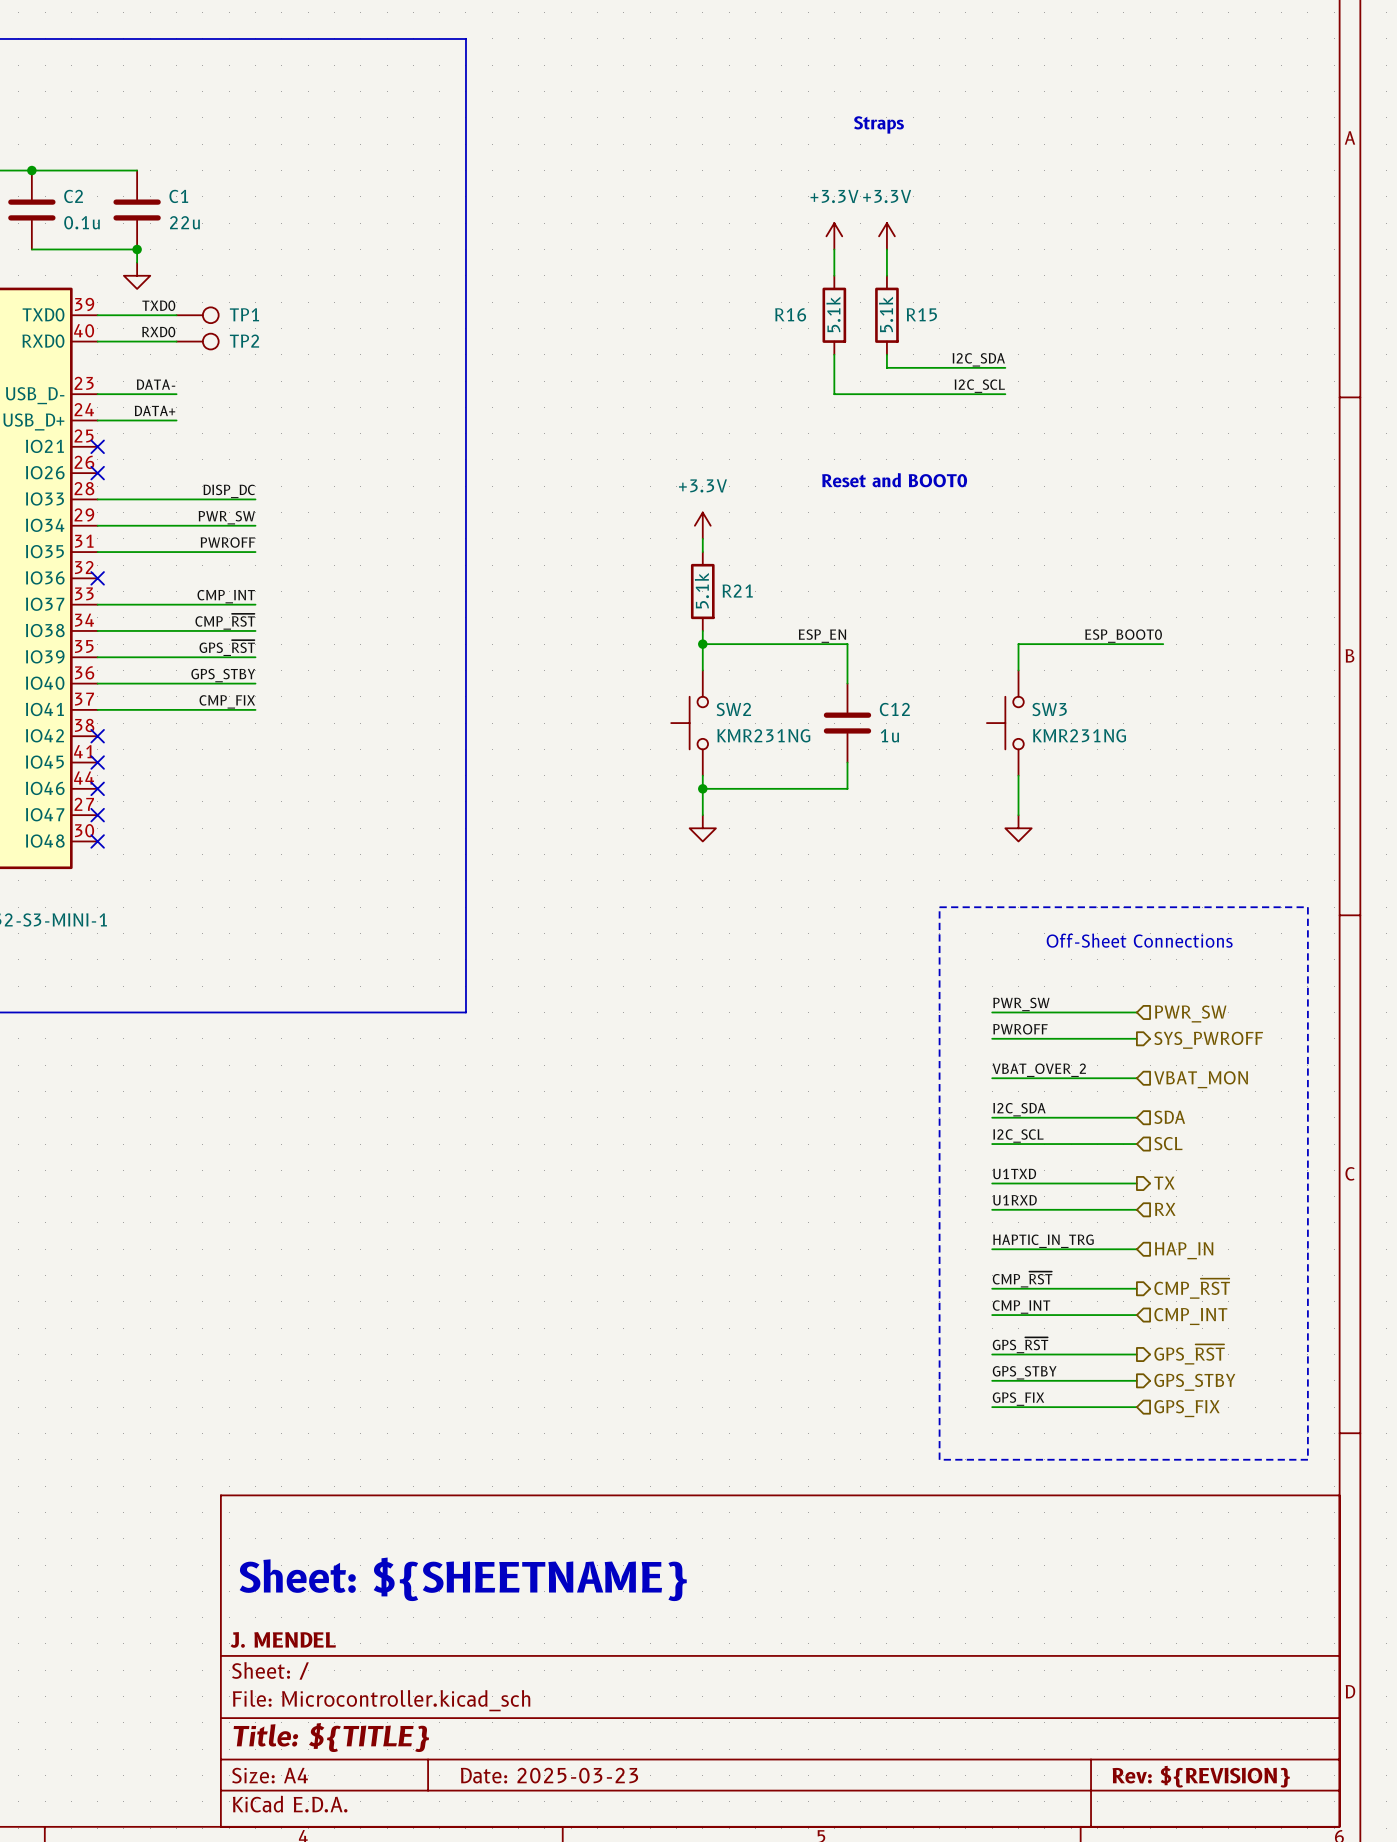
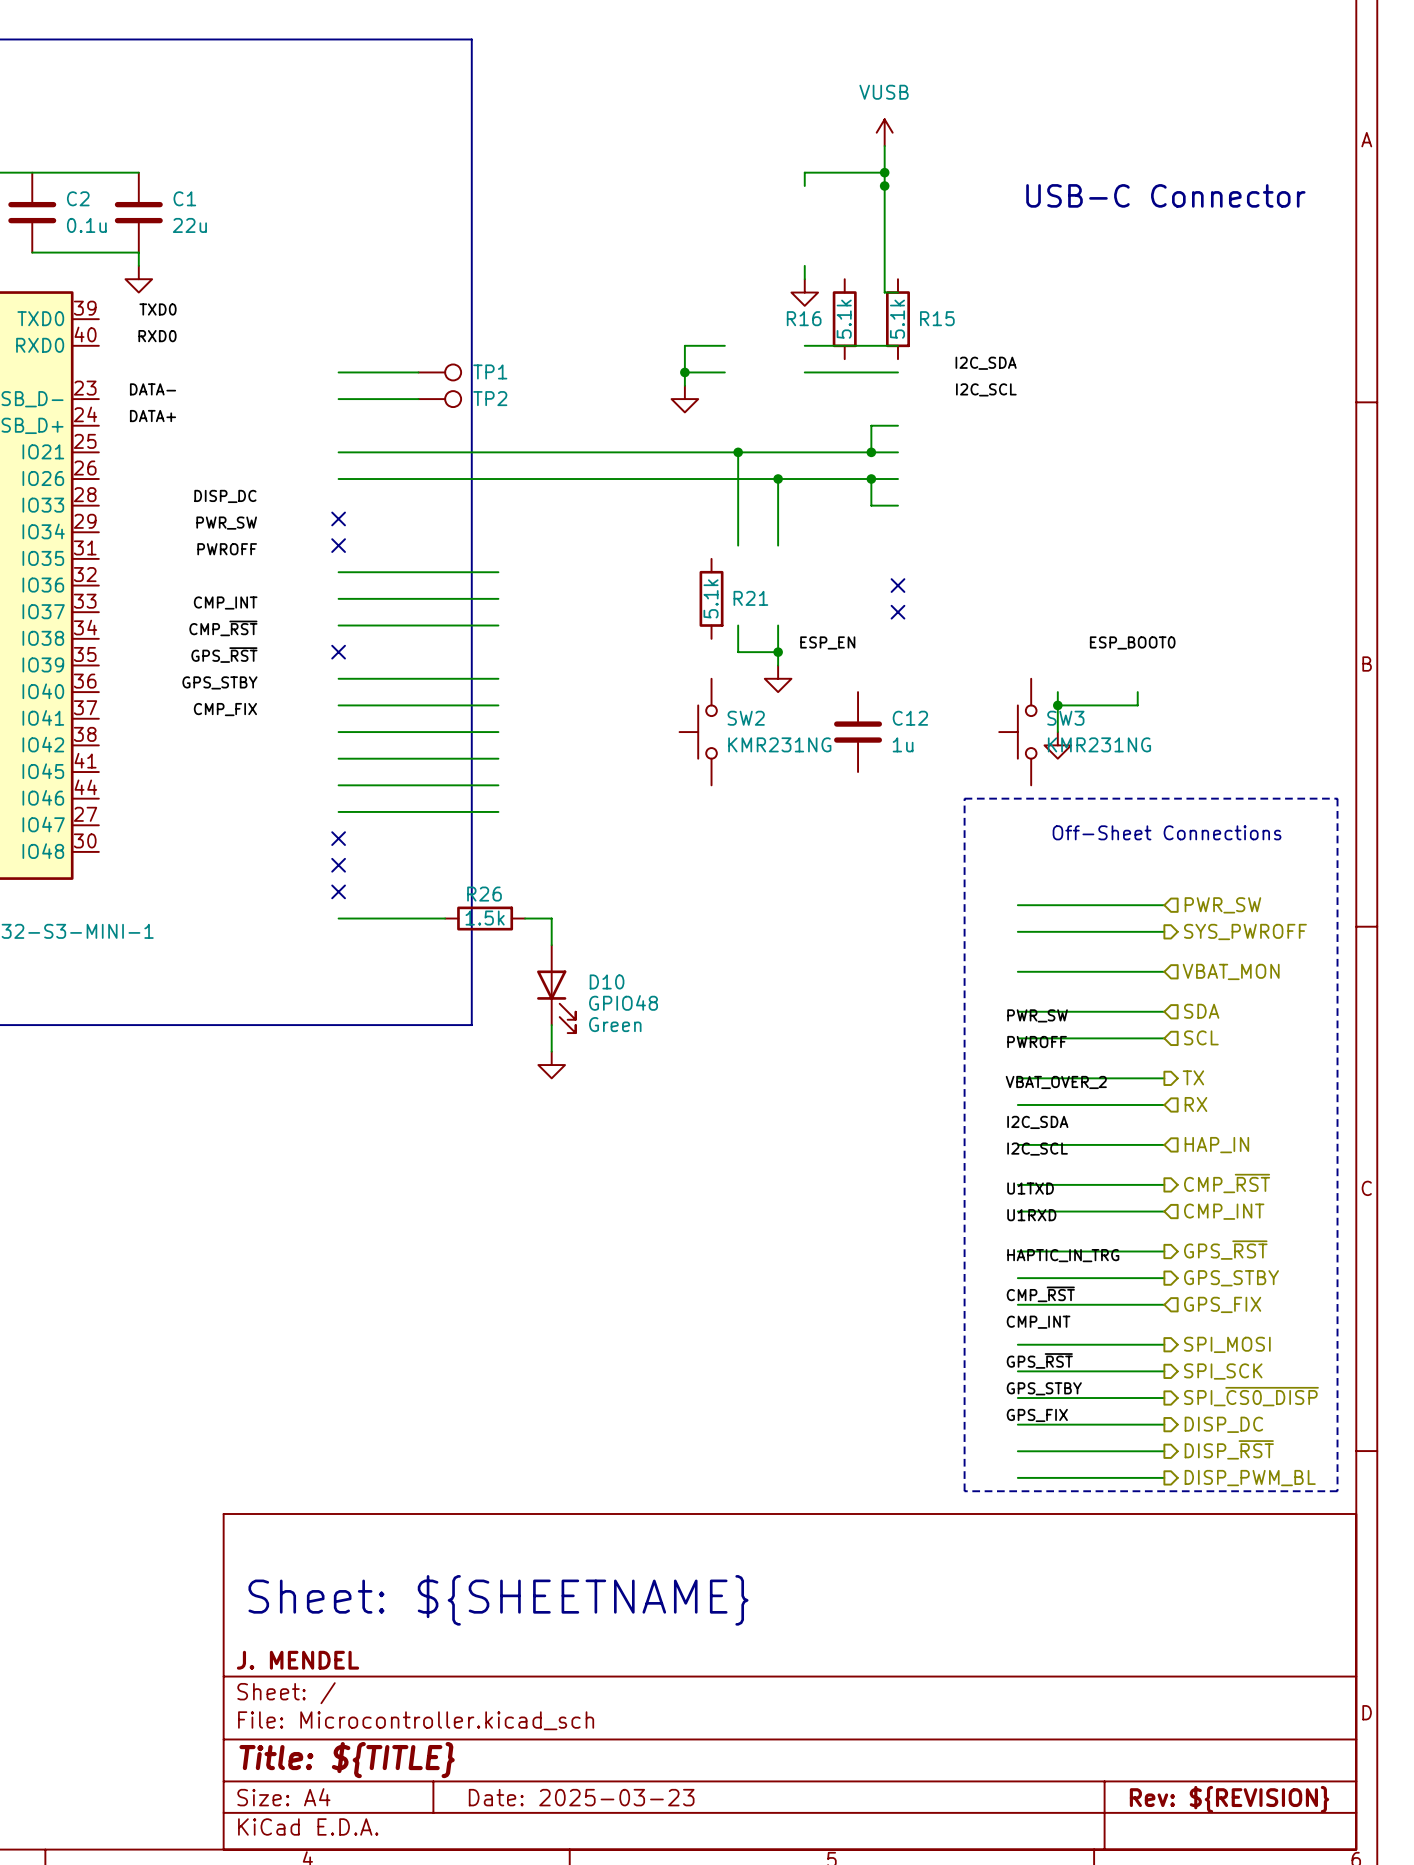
text: Straps (879, 124) -> none
power symbol: none -> VUSB (884, 132)
wire: none -> (884, 146) (884, 292) (897, 292)
junction: (31, 170) -> none
wire: none -> (884, 172) (804, 172) (804, 185)
junction: none -> (884, 172)
junction: none -> (884, 185)
text: none -> USB-C Connector (1165, 195)
power symbol: +3.3V (834, 236) -> none
power symbol: +3.3V (886, 236) -> none
junction: (137, 249) -> none
wire: (834, 249) (834, 275) -> none
wire: (886, 249) (886, 275) -> none
wire: none -> (804, 265) (804, 279)
power symbol: none -> (804, 292)
wire: (97, 315) (176, 315) -> none
TP1 position: (197, 315) -> (439, 372)
wire: (97, 341) (176, 341) -> none
TP2 position: (197, 341) -> (439, 399)
wire: none -> (724, 345) (684, 345) (684, 385)
wire: none -> (804, 345) (897, 345)
wire: (834, 354) (834, 394) (1005, 394) -> none
wire: (886, 354) (886, 367) (1005, 367) -> none
wire: none -> (684, 372) (724, 372)
junction: none -> (684, 372)
wire: none -> (804, 372) (897, 372)
wire: (97, 394) (176, 394) -> (338, 372) (418, 372)
power symbol: none -> (684, 399)
wire: (97, 420) (176, 420) -> (338, 399) (418, 399)
wire: none -> (897, 425) (871, 425) (871, 452)
no-connect mark: (97, 446) -> none
wire: none -> (338, 452) (897, 452)
wire: none -> (738, 452) (738, 545)
junction: none -> (738, 452)
junction: none -> (871, 452)
no-connect mark: (97, 473) -> none
wire: none -> (338, 479) (897, 479)
wire: none -> (778, 479) (778, 545)
junction: none -> (778, 479)
wire: none -> (871, 479) (871, 505) (897, 505)
junction: none -> (871, 479)
text: Reset and BOOT0 (894, 480) -> none
wire: (97, 499) (255, 499) -> (338, 572) (498, 572)
no-connect mark: none -> (338, 518)
wire: (97, 525) (255, 525) -> (338, 598) (498, 598)
power symbol: +3.3V (702, 525) -> none
no-connect mark: none -> (338, 545)
wire: (702, 538) (702, 552) -> none
wire: (97, 552) (255, 552) -> (338, 625) (498, 625)
no-connect mark: (97, 578) -> none
no-connect mark: none -> (897, 585)
wire: (97, 604) (255, 604) -> (338, 678) (498, 678)
no-connect mark: none -> (897, 612)
wire: (97, 630) (255, 630) -> (338, 705) (498, 705)
wire: (702, 630) (702, 670) -> (778, 625) (778, 665)
no-connect mark: none -> (338, 652)
wire: (702, 644) (729, 644) -> (738, 625) (738, 652)
junction: (702, 644) -> none
wire: (768, 644) (847, 644) (847, 683) -> none
junction: none -> (778, 652)
wire: (1163, 644) (1018, 644) (1018, 670) -> none
wire: (97, 657) (255, 657) -> (338, 732) (498, 732)
power symbol: none -> (778, 678)
wire: (97, 683) (255, 683) -> (338, 758) (498, 758)
wire: none -> (1137, 692) (1137, 705) (1057, 705)
junction: none -> (1057, 705)
wire: (97, 709) (255, 709) -> (338, 785) (498, 785)
no-connect mark: (97, 736) -> none
no-connect mark: (97, 762) -> none
wire: (847, 762) (847, 788) (702, 788) -> none
wire: (702, 775) (702, 815) -> none
wire: (1018, 775) (1018, 815) -> (1057, 692) (1057, 732)
no-connect mark: (97, 788) -> none
junction: (702, 788) -> none
wire: none -> (338, 811) (498, 811)
no-connect mark: (97, 815) -> none
no-connect mark: none -> (338, 838)
power symbol: (702, 828) -> none
power symbol position: (1018, 828) -> (1057, 745)
no-connect mark: (97, 841) -> none
no-connect mark: none -> (338, 865)
no-connect mark: none -> (338, 891)
wire: none -> (338, 918) (445, 918)
R26: none -> 1.5k (485, 918)
wire: none -> (525, 918) (551, 918) (551, 945)
line: (939, 907) (1307, 907) (1307, 1459) (939, 1459) (939, 907) -> (964, 798) (964, 1491) (1337, 1491) (1337, 798) (964, 798)
text position: Off-Sheet Connections (1139, 940) -> Off-Sheet Connections (1167, 832)
D10: none -> GPIO48 (556, 989)
wire: none -> (551, 1025) (551, 1051)
wire: (992, 1012) (1136, 1012) -> (1017, 905) (1164, 905)
hierarchical label position: PWR_SW (1190, 1013) -> PWR_SW (1222, 905)
wire: (992, 1038) (1136, 1038) -> (1017, 931) (1164, 931)
hierarchical label position: SYS_PWROFF (1208, 1040) -> SYS_PWROFF (1245, 931)
power symbol: none -> (551, 1065)
wire: (992, 1078) (1136, 1078) -> (1017, 971) (1164, 971)
hierarchical label position: VBAT_MON (1201, 1079) -> VBAT_MON (1231, 971)
wire: (992, 1117) (1136, 1117) -> (1017, 1011) (1164, 1011)
hierarchical label position: SDA (1169, 1117) -> SDA (1201, 1011)
hierarchical label position: SCL (1168, 1143) -> SCL (1201, 1037)
wire: (992, 1144) (1136, 1144) -> (1017, 1038) (1164, 1038)
wire: none -> (1017, 1184) (1164, 1184)
wire: (992, 1183) (1136, 1183) -> (1017, 1078) (1164, 1078)
hierarchical label position: TX (1164, 1183) -> TX (1193, 1077)
wire: (992, 1209) (1136, 1209) -> (1017, 1104) (1164, 1104)
hierarchical label position: RX (1165, 1209) -> RX (1195, 1104)
wire: none -> (1017, 1251) (1164, 1251)
wire: (992, 1249) (1136, 1249) -> (1017, 1144) (1164, 1144)
hierarchical label position: HAP_IN (1184, 1250) -> HAP_IN (1216, 1145)
wire: none -> (1017, 1278) (1164, 1278)
wire: (992, 1288) (1005, 1288) -> (1151, 1304) (1164, 1304)
hierarchical label position: CMP_~{RST} (1192, 1288) -> CMP_~{RST} (1227, 1183)
wire: (992, 1315) (1136, 1315) -> (1017, 1211) (1164, 1211)
hierarchical label position: CMP_INT (1190, 1316) -> CMP_INT (1224, 1211)
wire: none -> (1017, 1344) (1164, 1344)
hierarchical label: none -> SPI_MOSI (1227, 1344)
wire: (992, 1354) (1005, 1354) -> (1151, 1371) (1164, 1371)
hierarchical label position: GPS_~{RST} (1189, 1354) -> GPS_~{RST} (1225, 1250)
hierarchical label: none -> SPI_SCK (1223, 1371)
wire: (992, 1380) (1005, 1380) -> (1151, 1398) (1164, 1398)
hierarchical label: none -> SPI_~{CS0_DISP} (1251, 1396)
hierarchical label position: GPS_STBY (1194, 1382) -> GPS_STBY (1231, 1278)
wire: (992, 1407) (1005, 1407) -> (1151, 1424) (1164, 1424)
hierarchical label position: GPS_FIX (1187, 1408) -> GPS_FIX (1222, 1304)
hierarchical label: none -> DISP_DC (1223, 1424)
wire: none -> (1017, 1451) (1164, 1451)
hierarchical label: none -> DISP_~{RST} (1229, 1449)
hierarchical label: none -> DISP_PWM_BL (1250, 1478)

